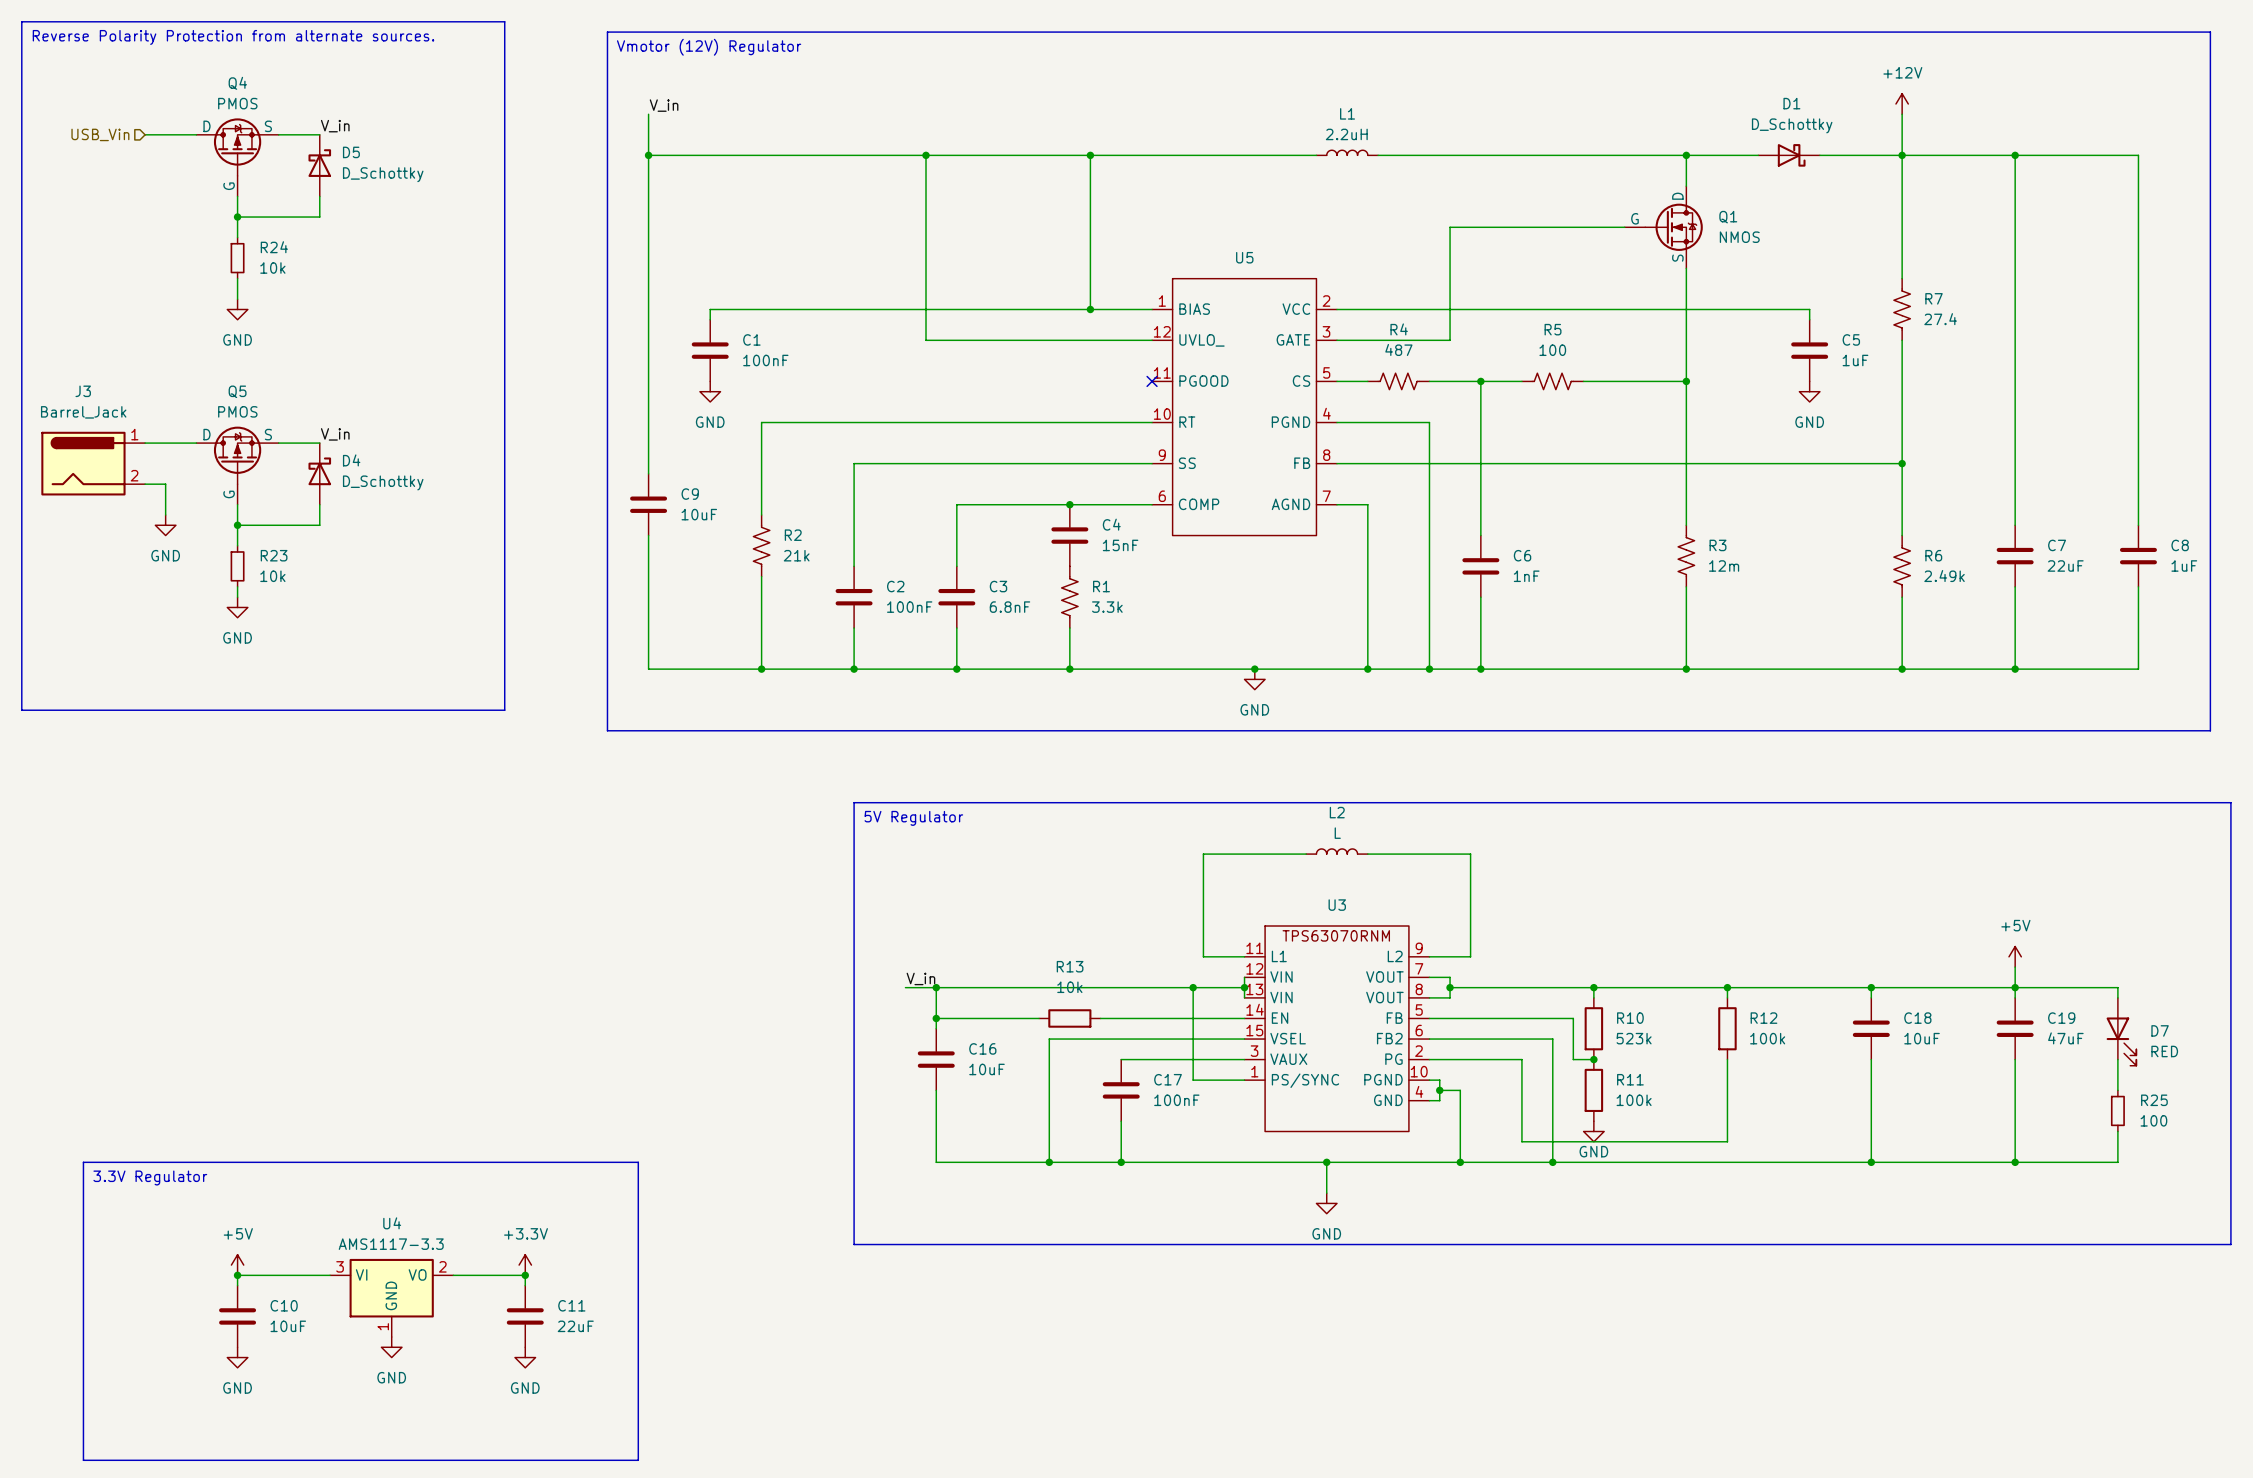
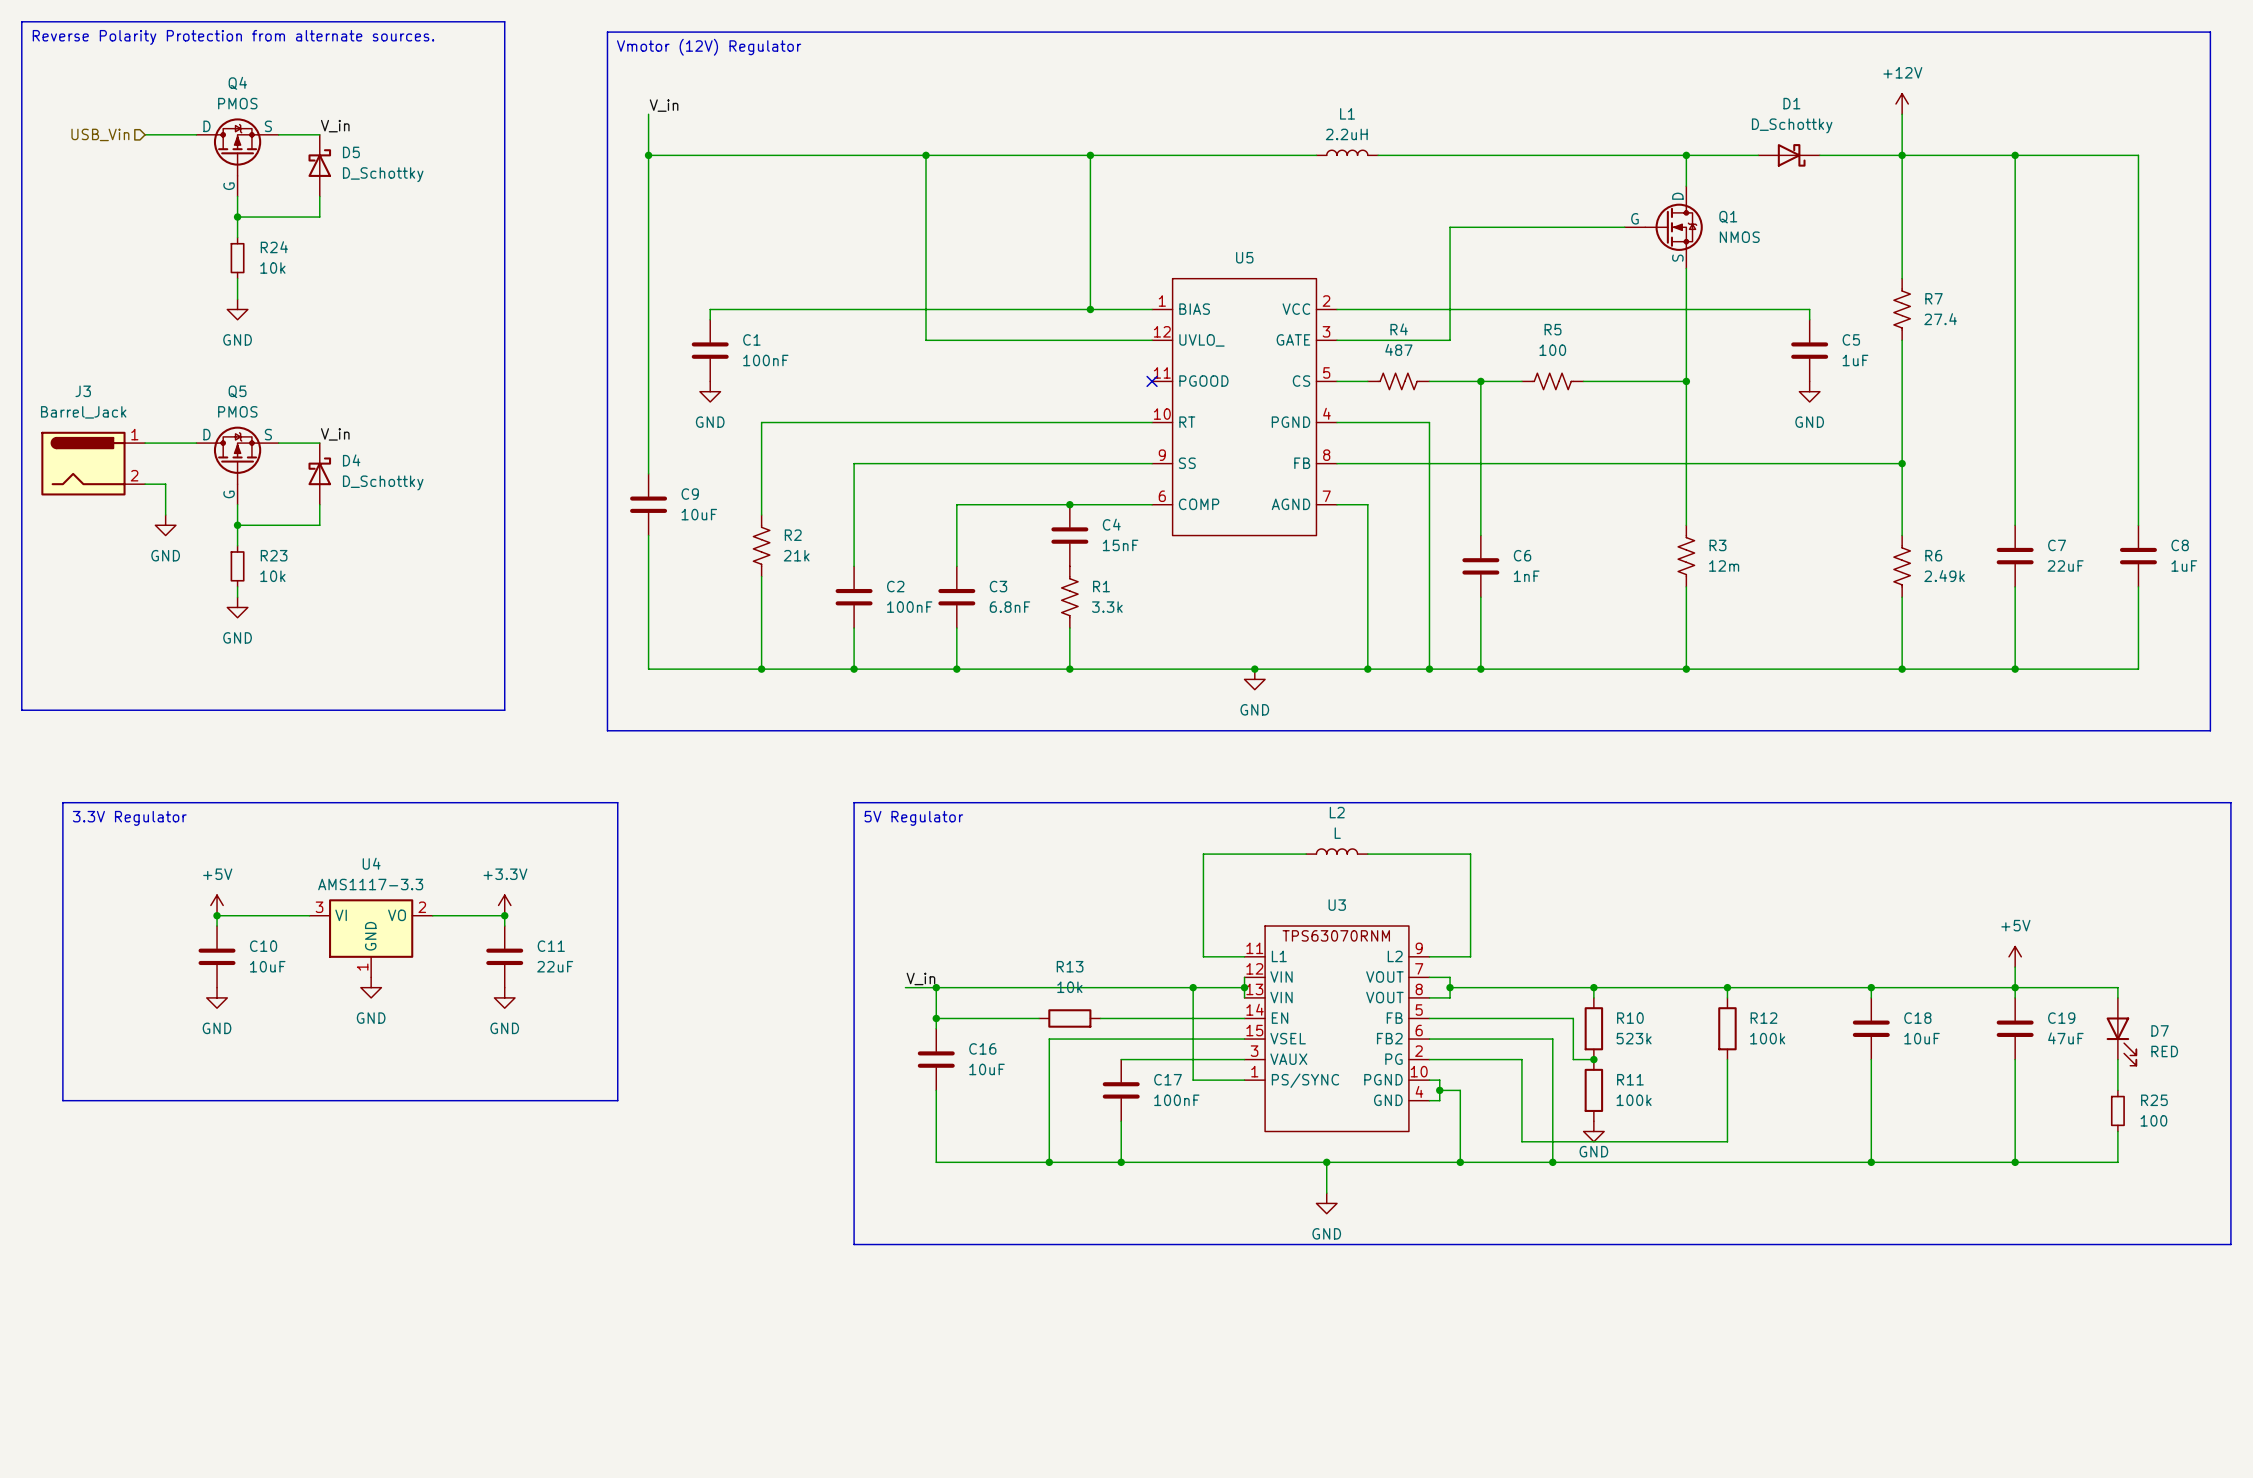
line: none -> (62, 802) (617, 802) (617, 1100) (62, 1100) (62, 802)
text: none -> 3.3V Regulator (129, 818)
power symbol: none -> +5V (217, 905)
power symbol: none -> +3.3V (504, 905)
junction: none -> (217, 915)
wire: none -> (309, 915) (217, 915) (217, 926)
wire: none -> (432, 915) (504, 915) (504, 926)
junction: none -> (504, 915)
power symbol: none -> GND (371, 987)
power symbol: none -> GND (217, 997)
power symbol: none -> GND (504, 997)
line: (83, 1162) (638, 1162) (638, 1460) (83, 1460) (83, 1162) -> none
text: 3.3V Regulator (150, 1177) -> none
power symbol: +5V (237, 1265) -> none
power symbol: +3.3V (525, 1265) -> none
junction: (237, 1275) -> none
wire: (330, 1275) (237, 1275) (237, 1285) -> none
wire: (453, 1275) (525, 1275) (525, 1285) -> none
junction: (525, 1275) -> none
U4 position: (391, 1297) -> (371, 938)
C10 position: (237, 1316) -> (217, 956)
C11 position: (525, 1316) -> (504, 956)
power symbol: GND (391, 1347) -> none
power symbol: GND (237, 1357) -> none
power symbol: GND (525, 1357) -> none

